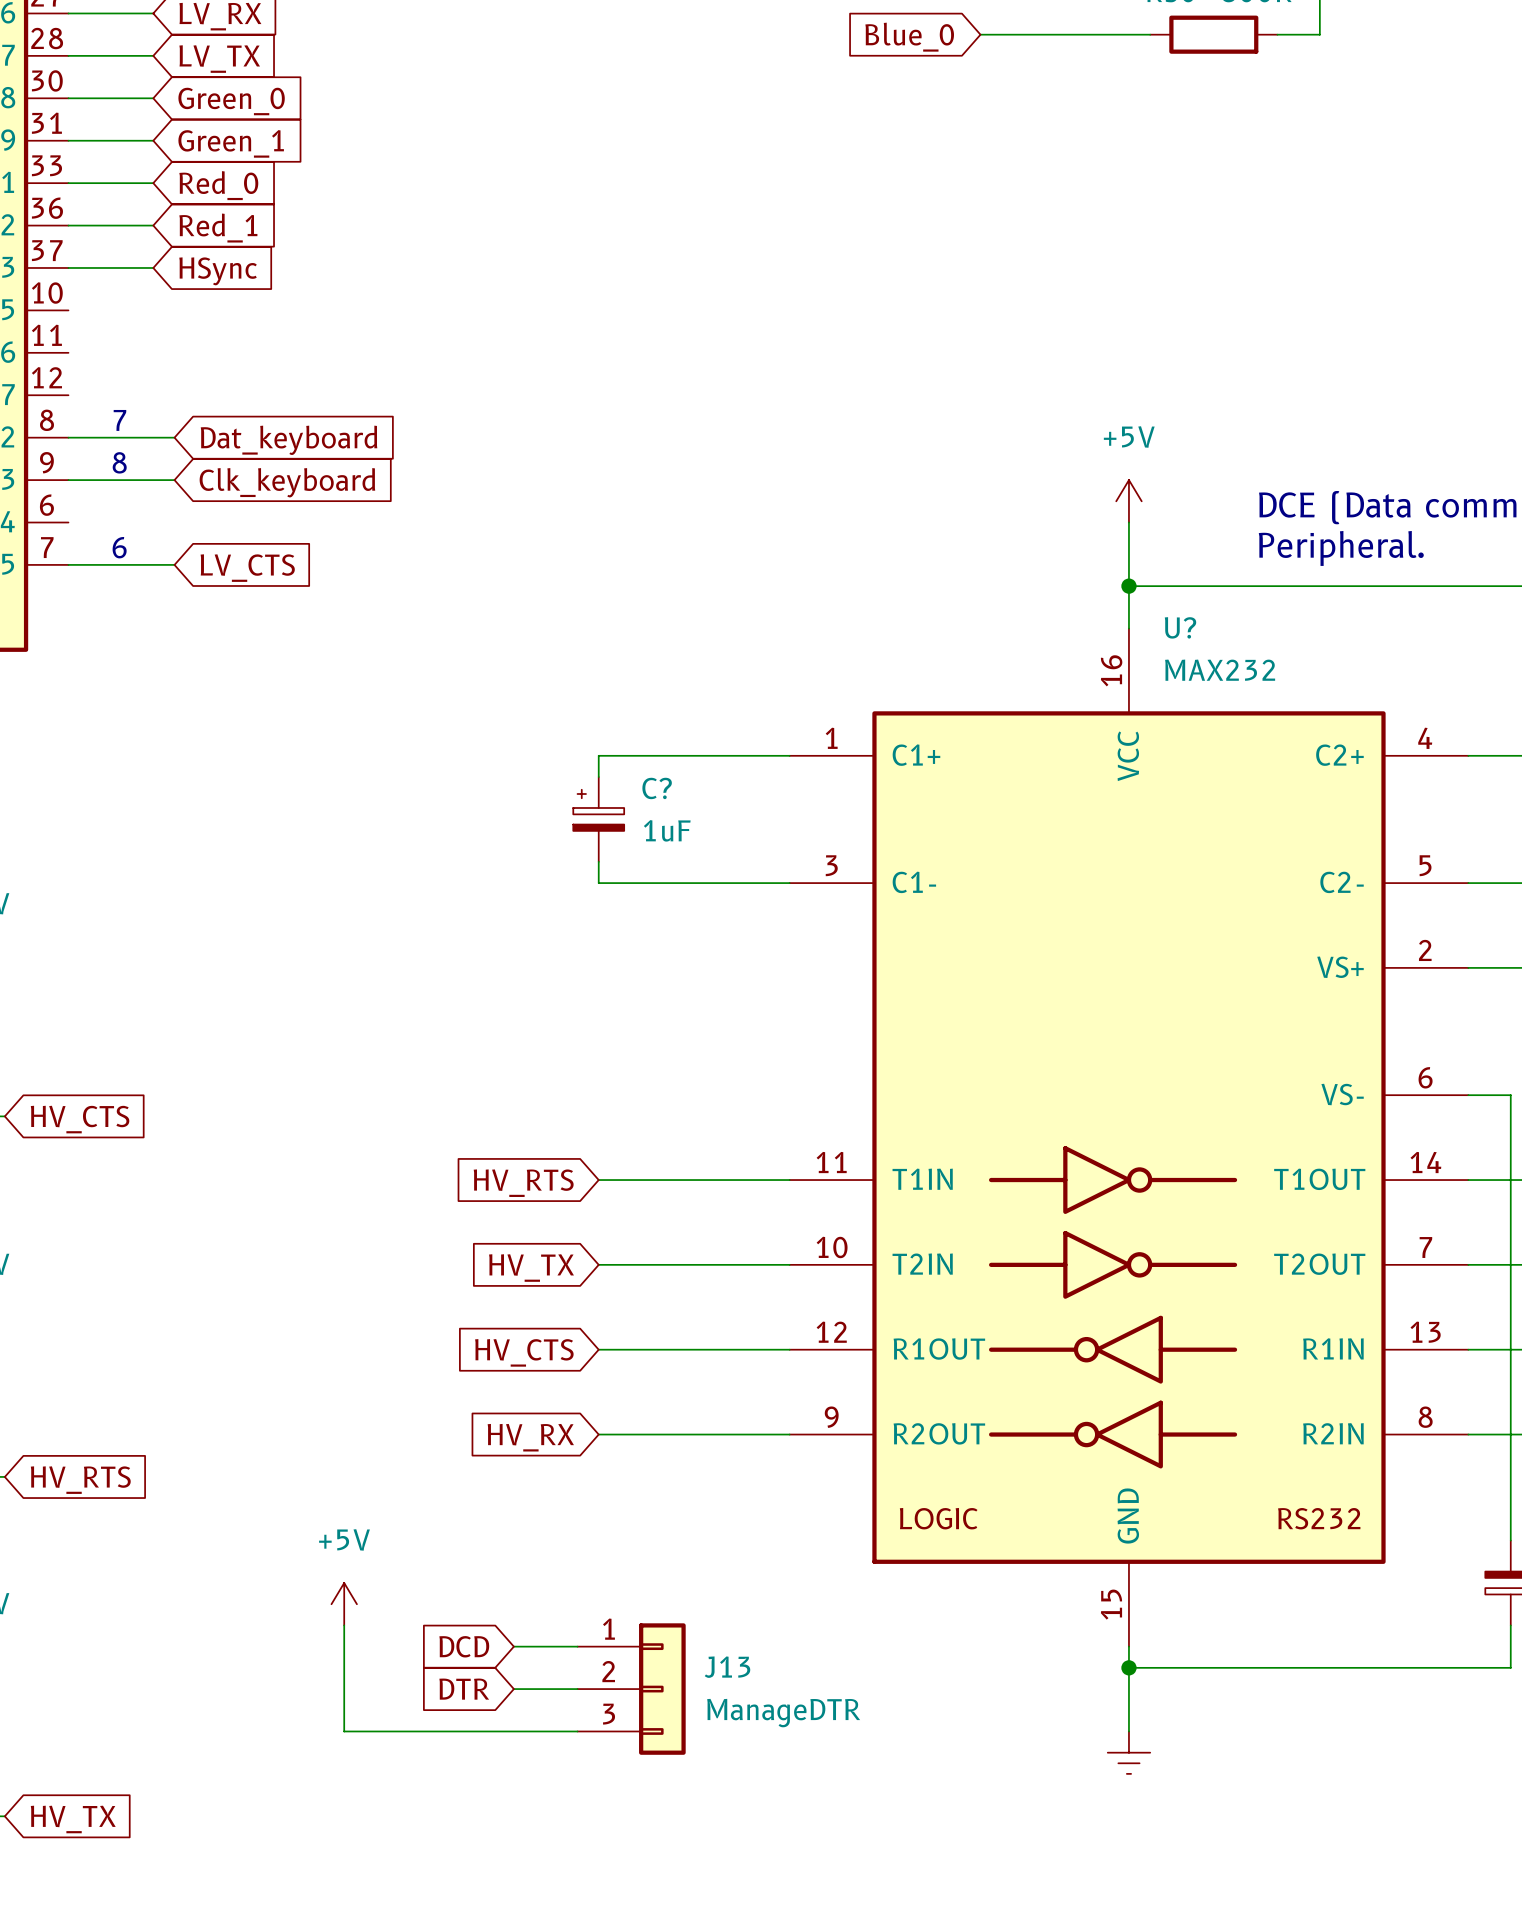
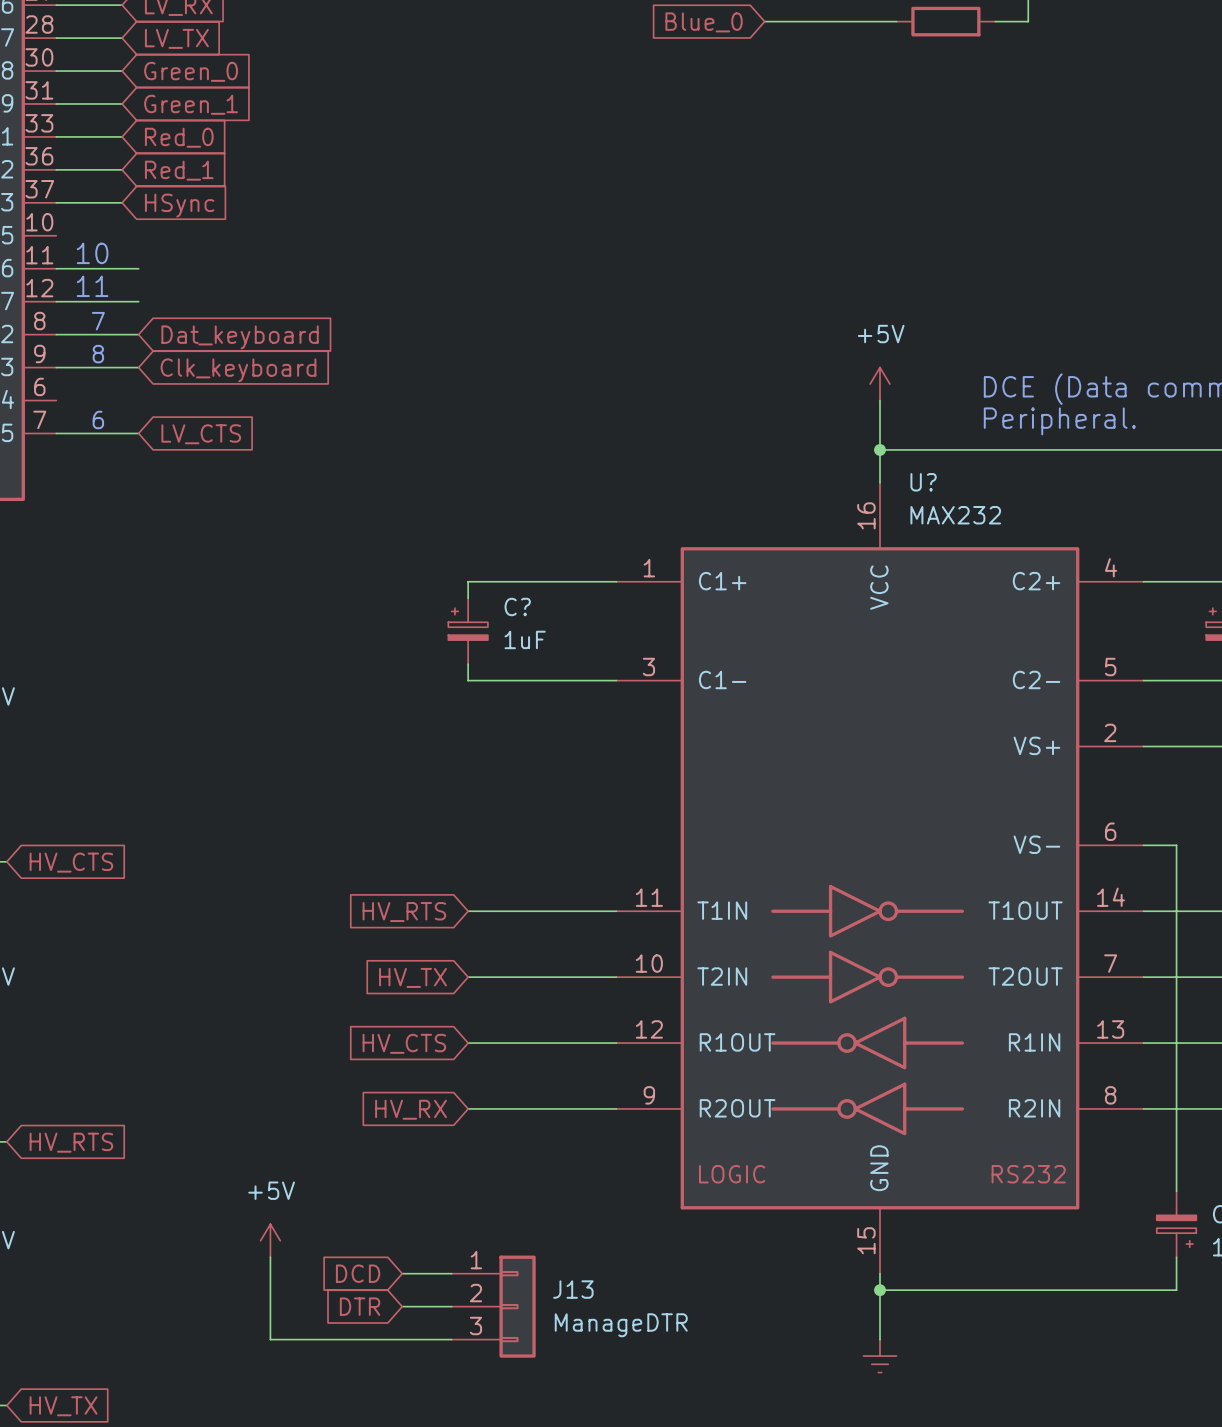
text: none -> 10 (92, 253)
wire: none -> (56, 268) (138, 268)
text: none -> 11 (92, 286)
wire: none -> (56, 301) (138, 301)

